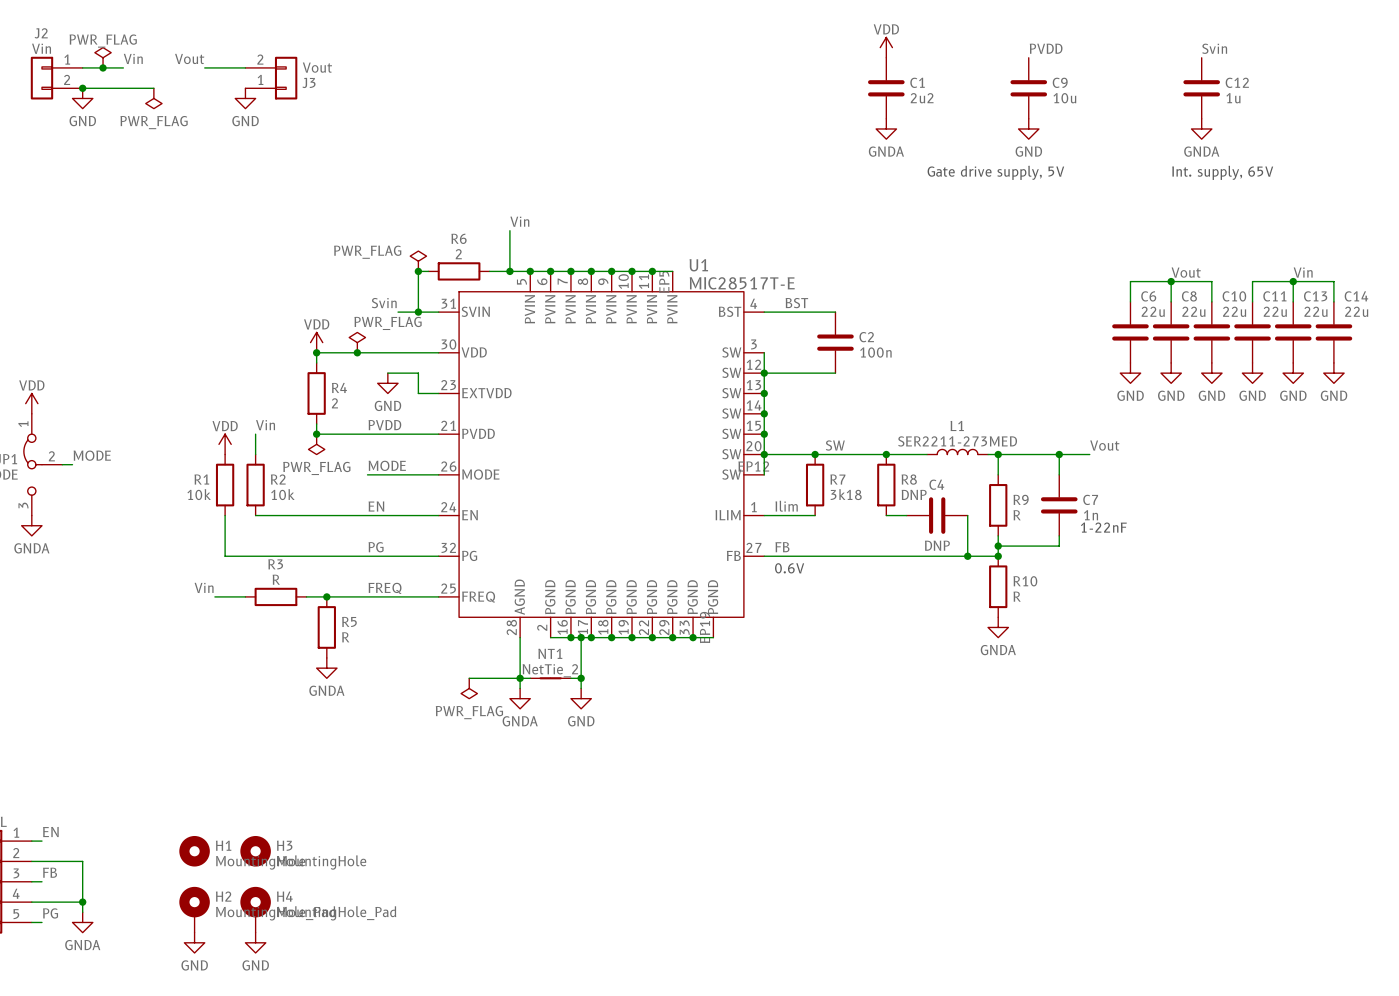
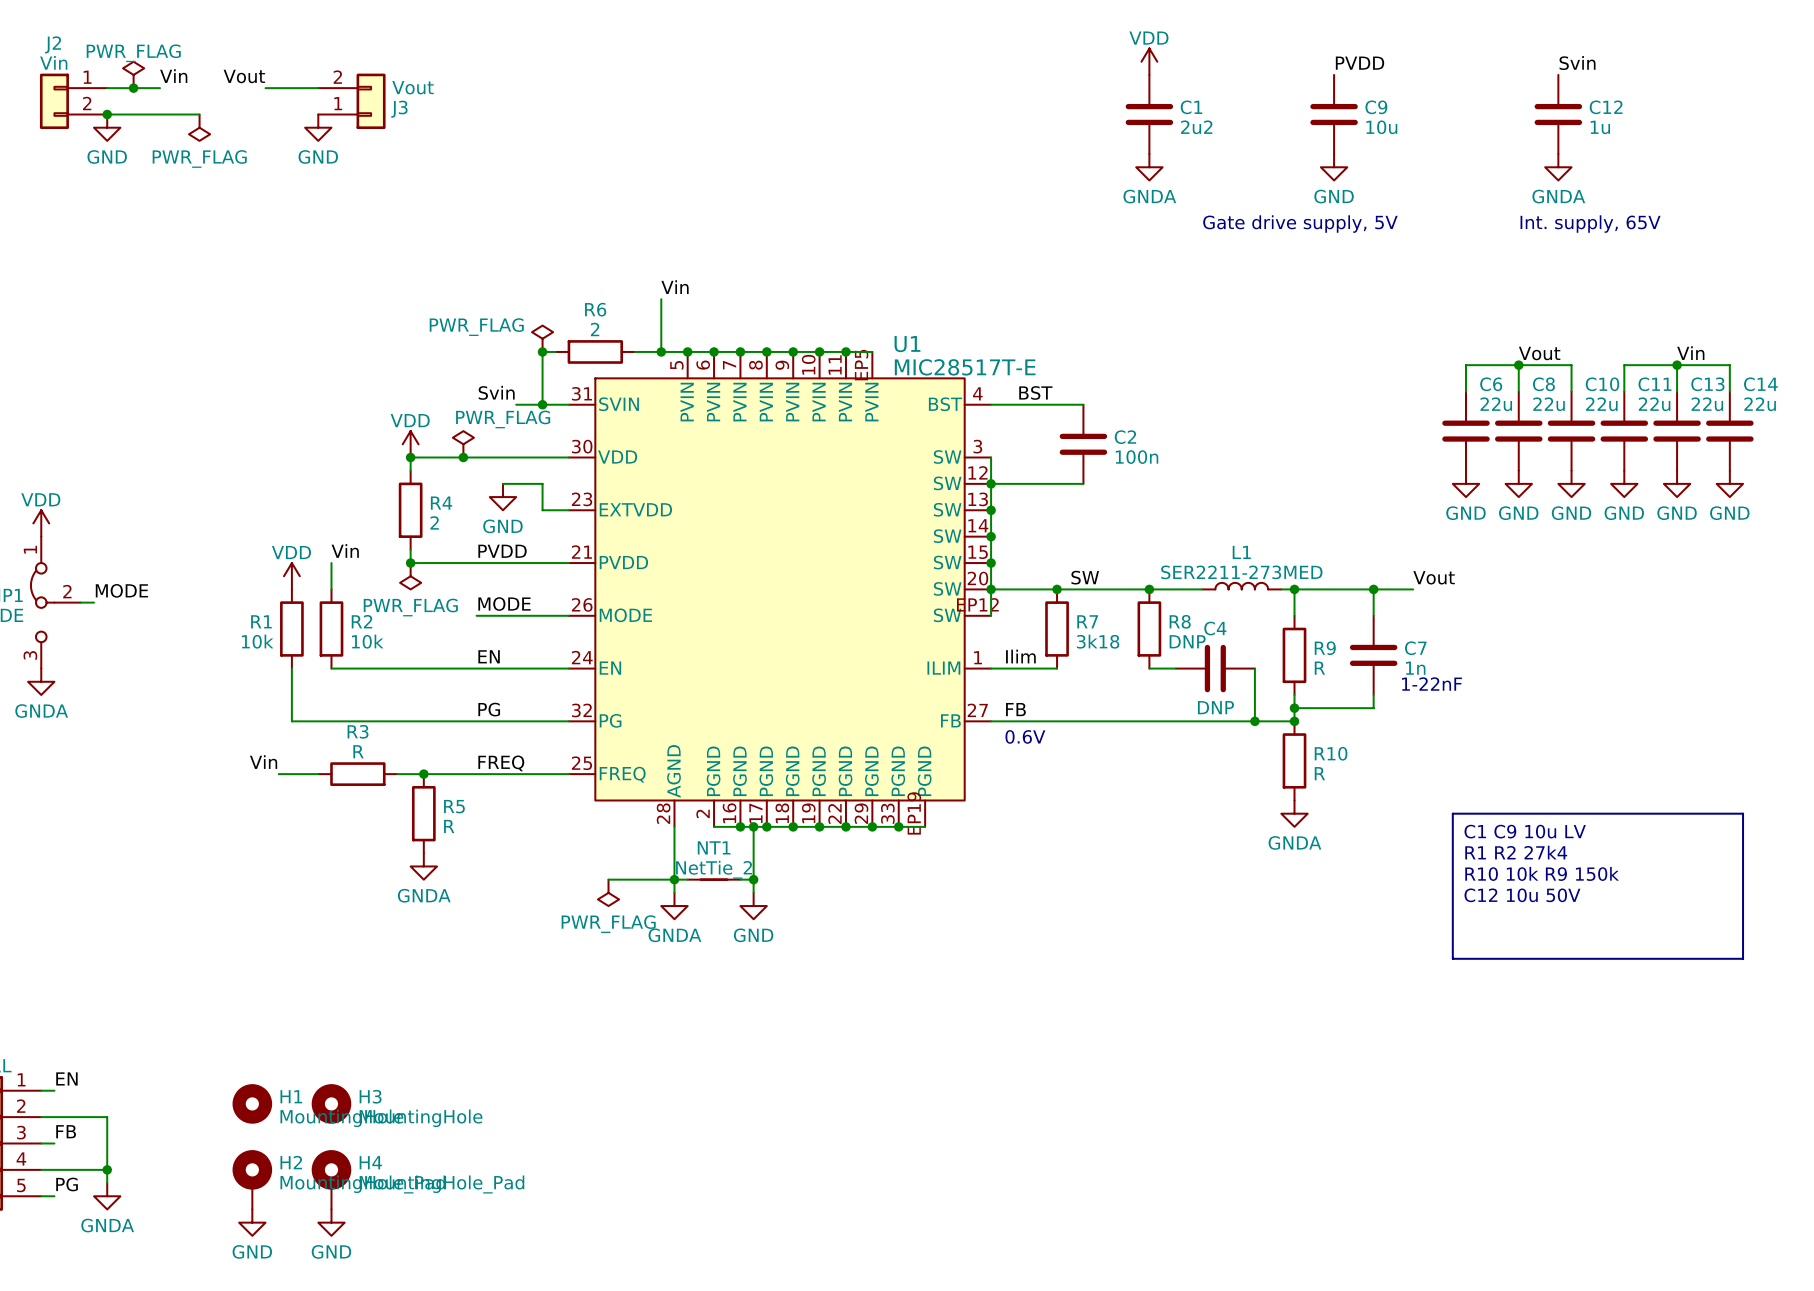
line: none -> (1452, 813) (1743, 813) (1743, 958) (1452, 958) (1452, 813)
text: none -> C1 C9 10u LV (1525, 831)
text: none -> R1 R2 27k4 (1516, 852)
text: none -> R10 10k R9 150k (1542, 873)
text: none -> C12 10u 50V (1522, 895)

